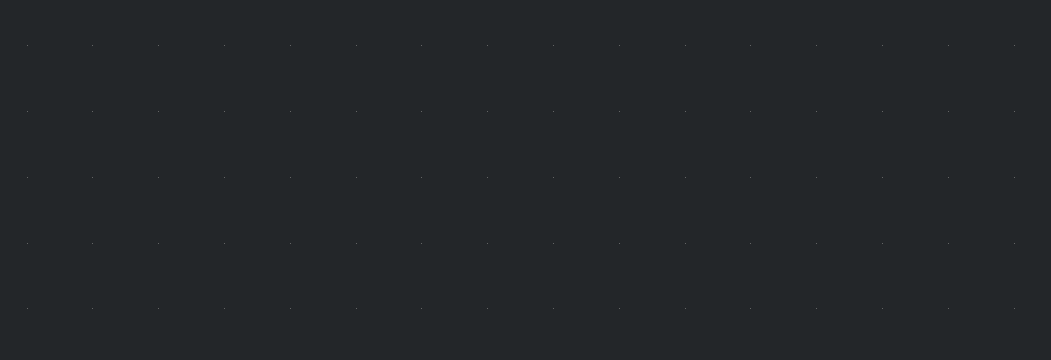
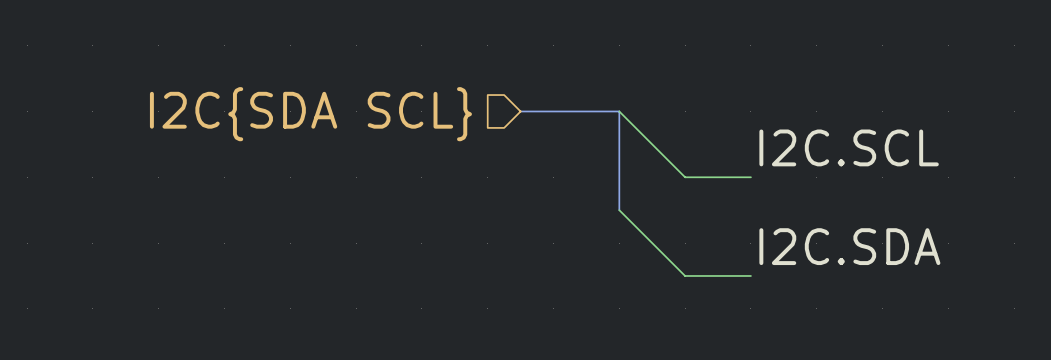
bus: none -> (520, 111) (619, 111) (619, 210)
wire: none -> (619, 111) (685, 177) (750, 177)
hierarchical label: none -> I2C{SDA SCL} (310, 114)
label: none -> I2C.SCL (849, 147)
wire: none -> (619, 210) (685, 275) (750, 275)
label: none -> I2C.SDA (849, 246)

